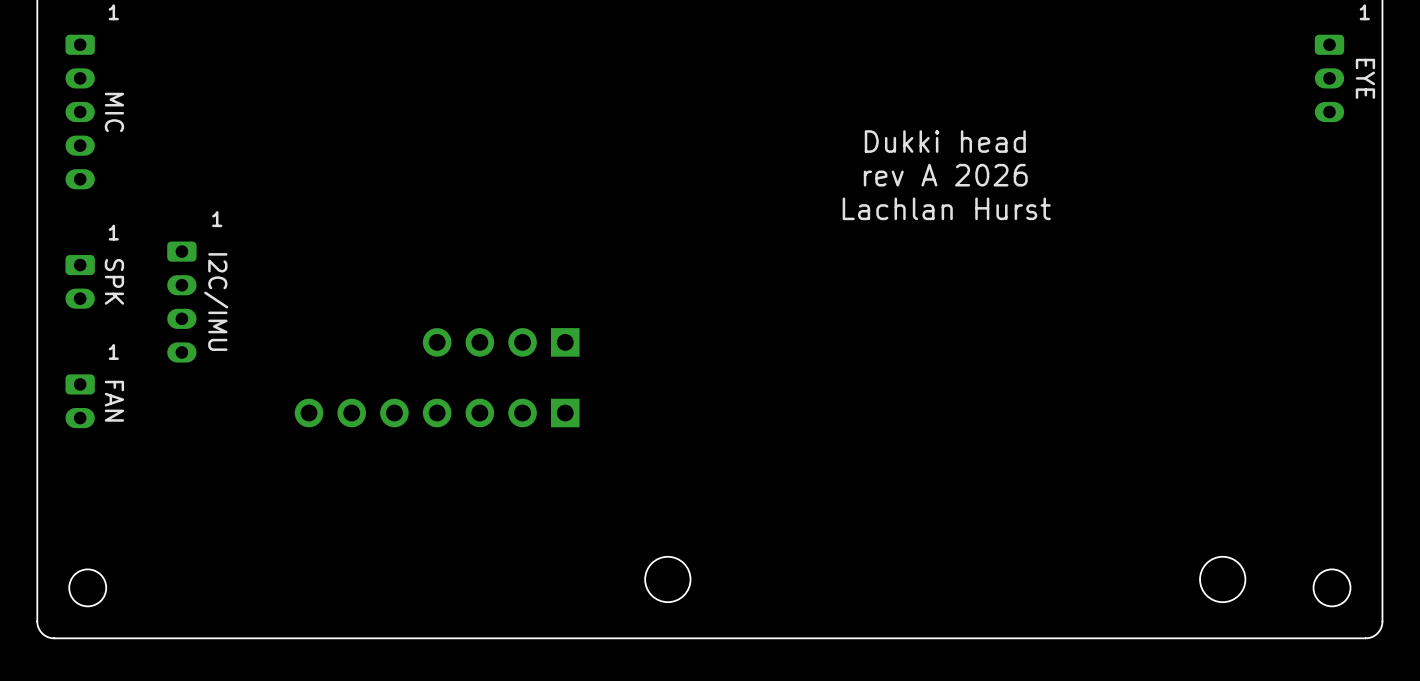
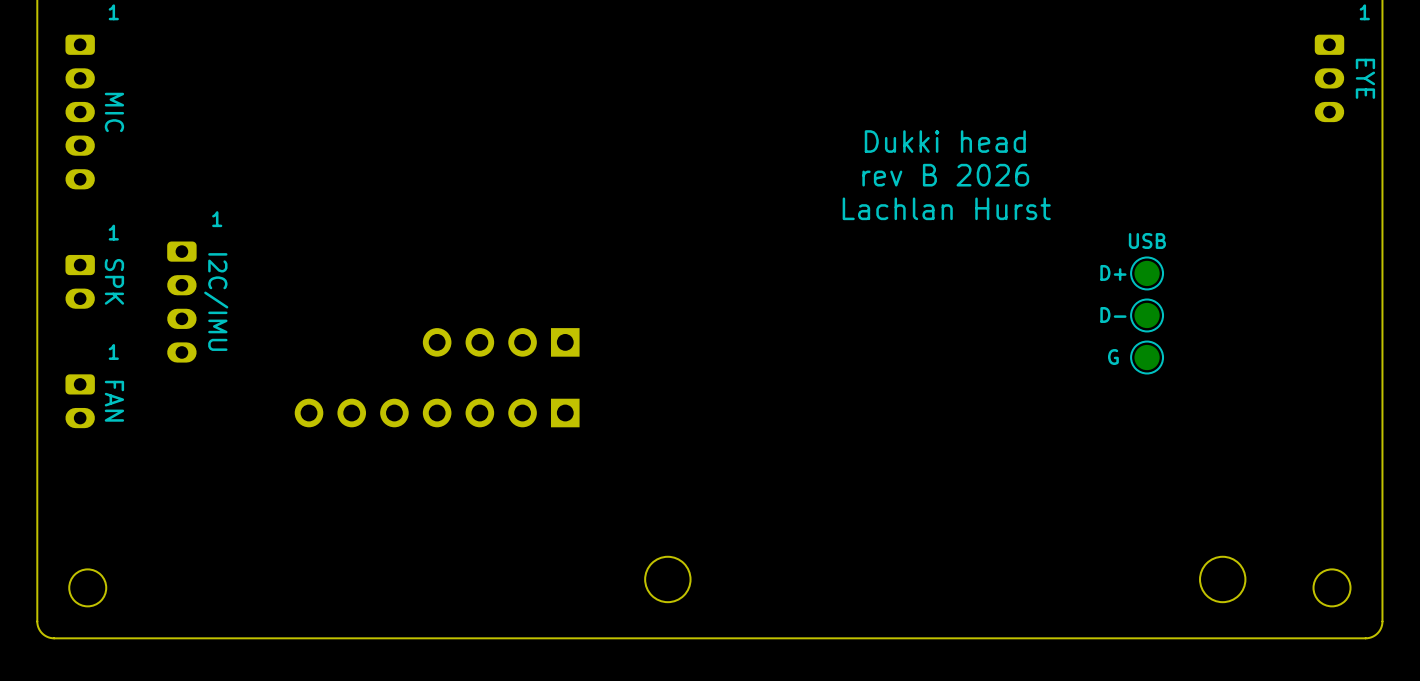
text: rev A 2026 (945, 175) -> rev B 2026 (945, 175)
text: none -> USB (1147, 241)
text: none -> D+ (1113, 272)
part: none -> (1147, 273)
text: none -> D- (1113, 314)
part: none -> (1147, 315)
text: none -> G (1113, 357)
part: none -> (1147, 357)

